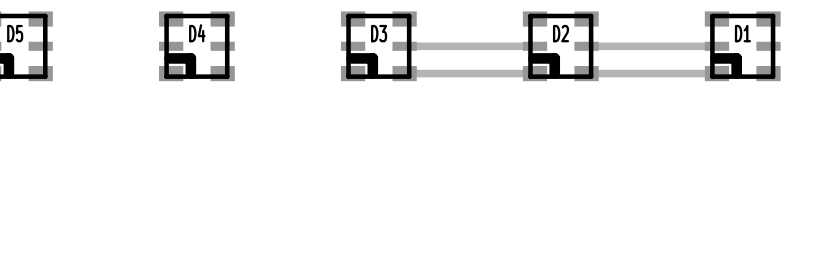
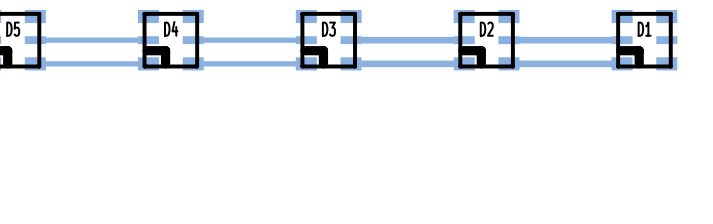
track: none -> (148, 40) (35, 40)
track: none -> (306, 40) (193, 40)
track: none -> (148, 63) (35, 63)
track: none -> (306, 63) (193, 63)

